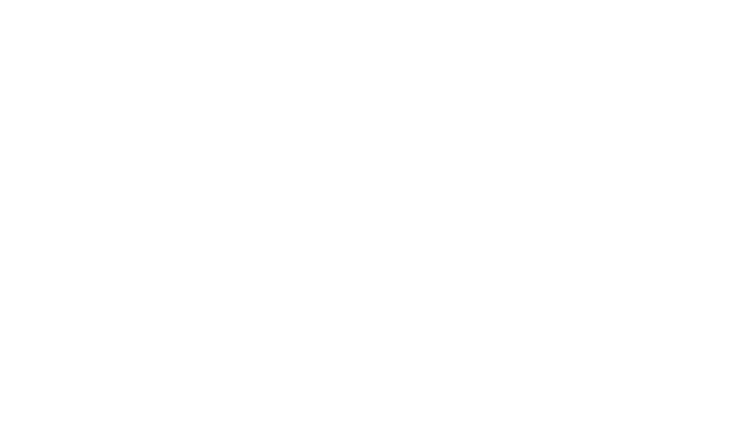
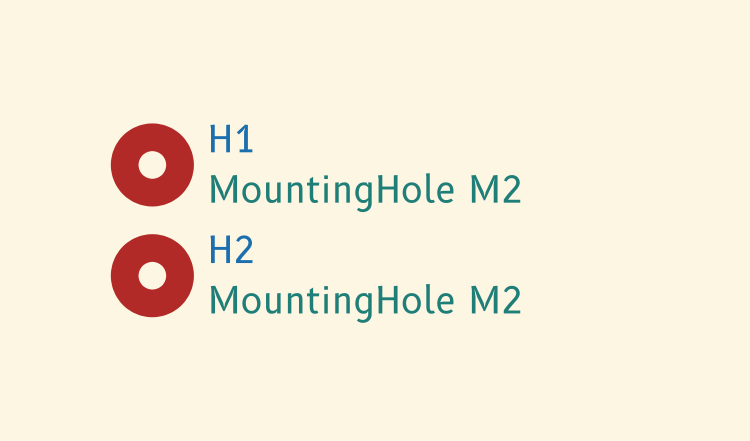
H1: none -> MountingHole M2 (152, 164)
H2: none -> MountingHole M2 (152, 275)

